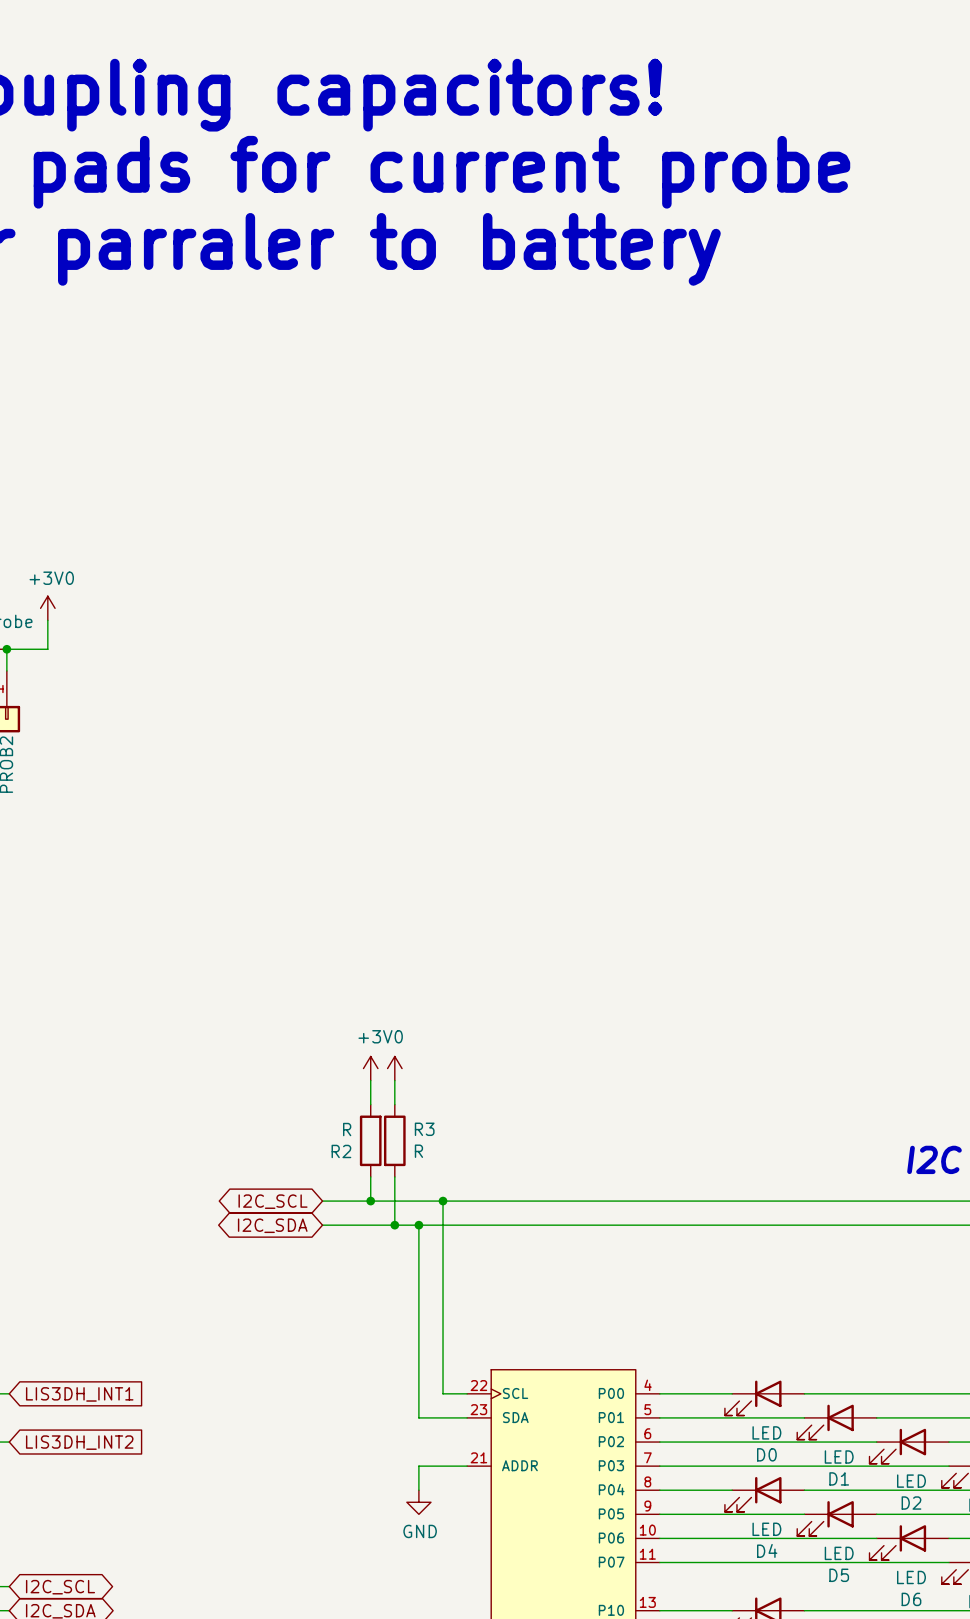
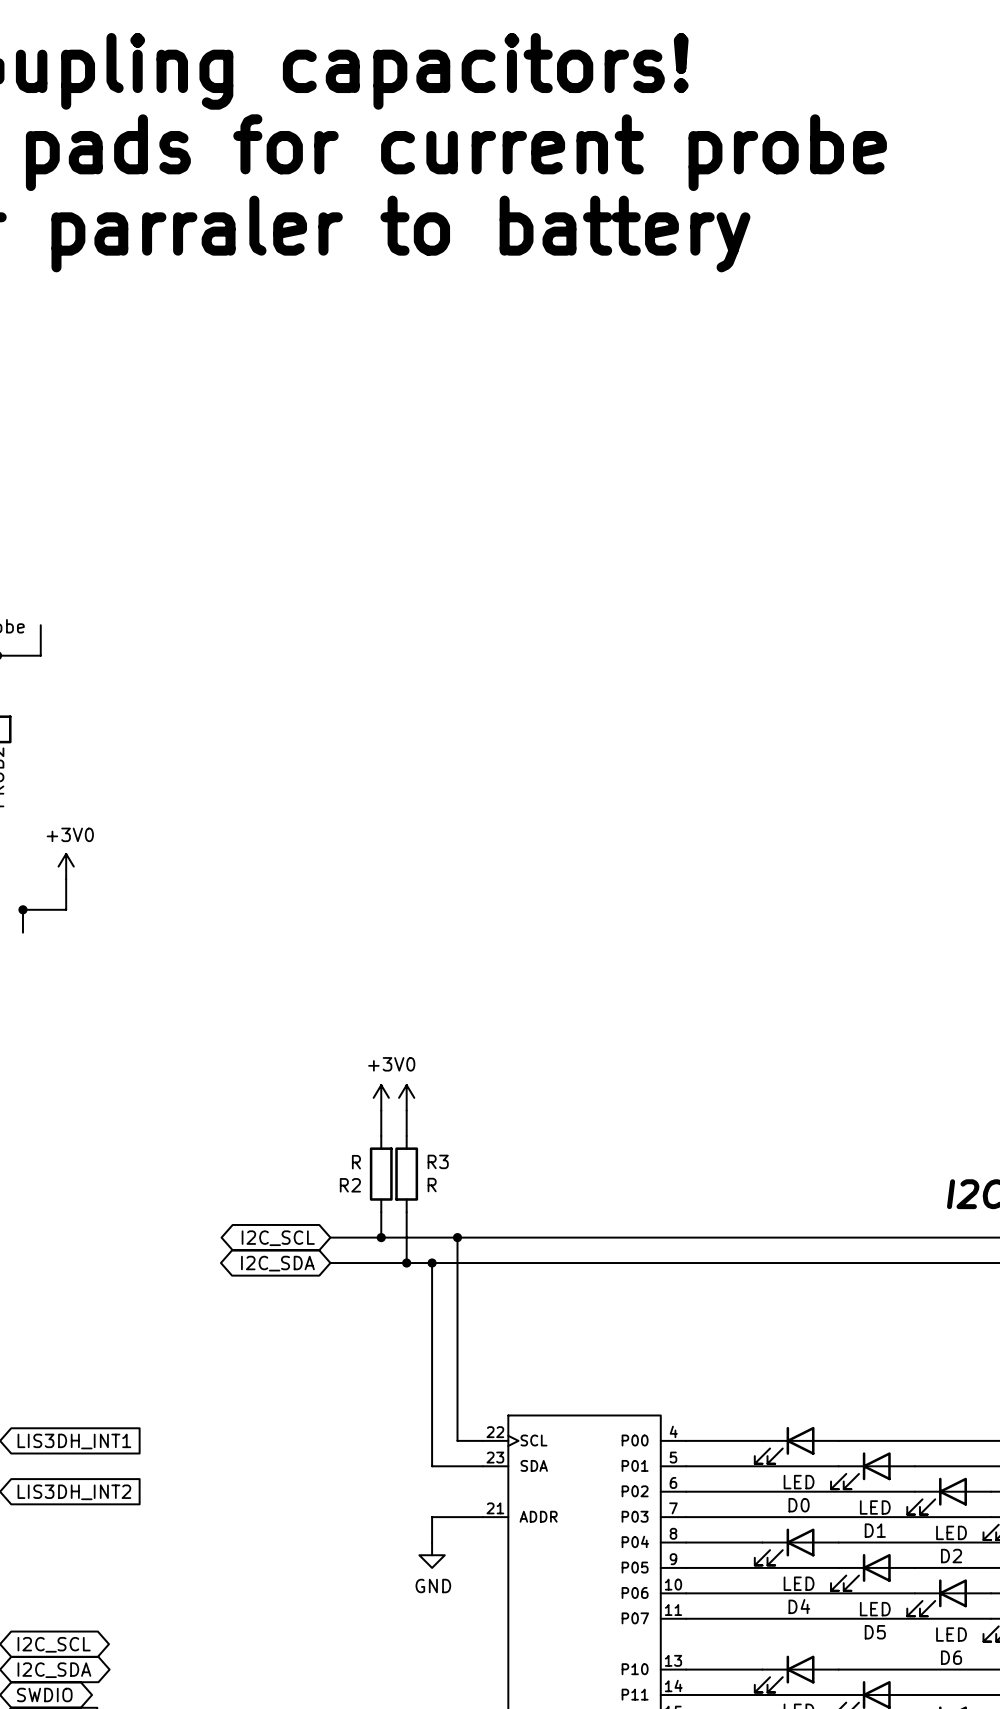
power symbol: +3V0 (47, 608) -> none
power symbol: none -> +3V0 (66, 866)
wire: none -> (66, 879) (66, 909) (22, 909) (22, 932)
junction: none -> (22, 909)

